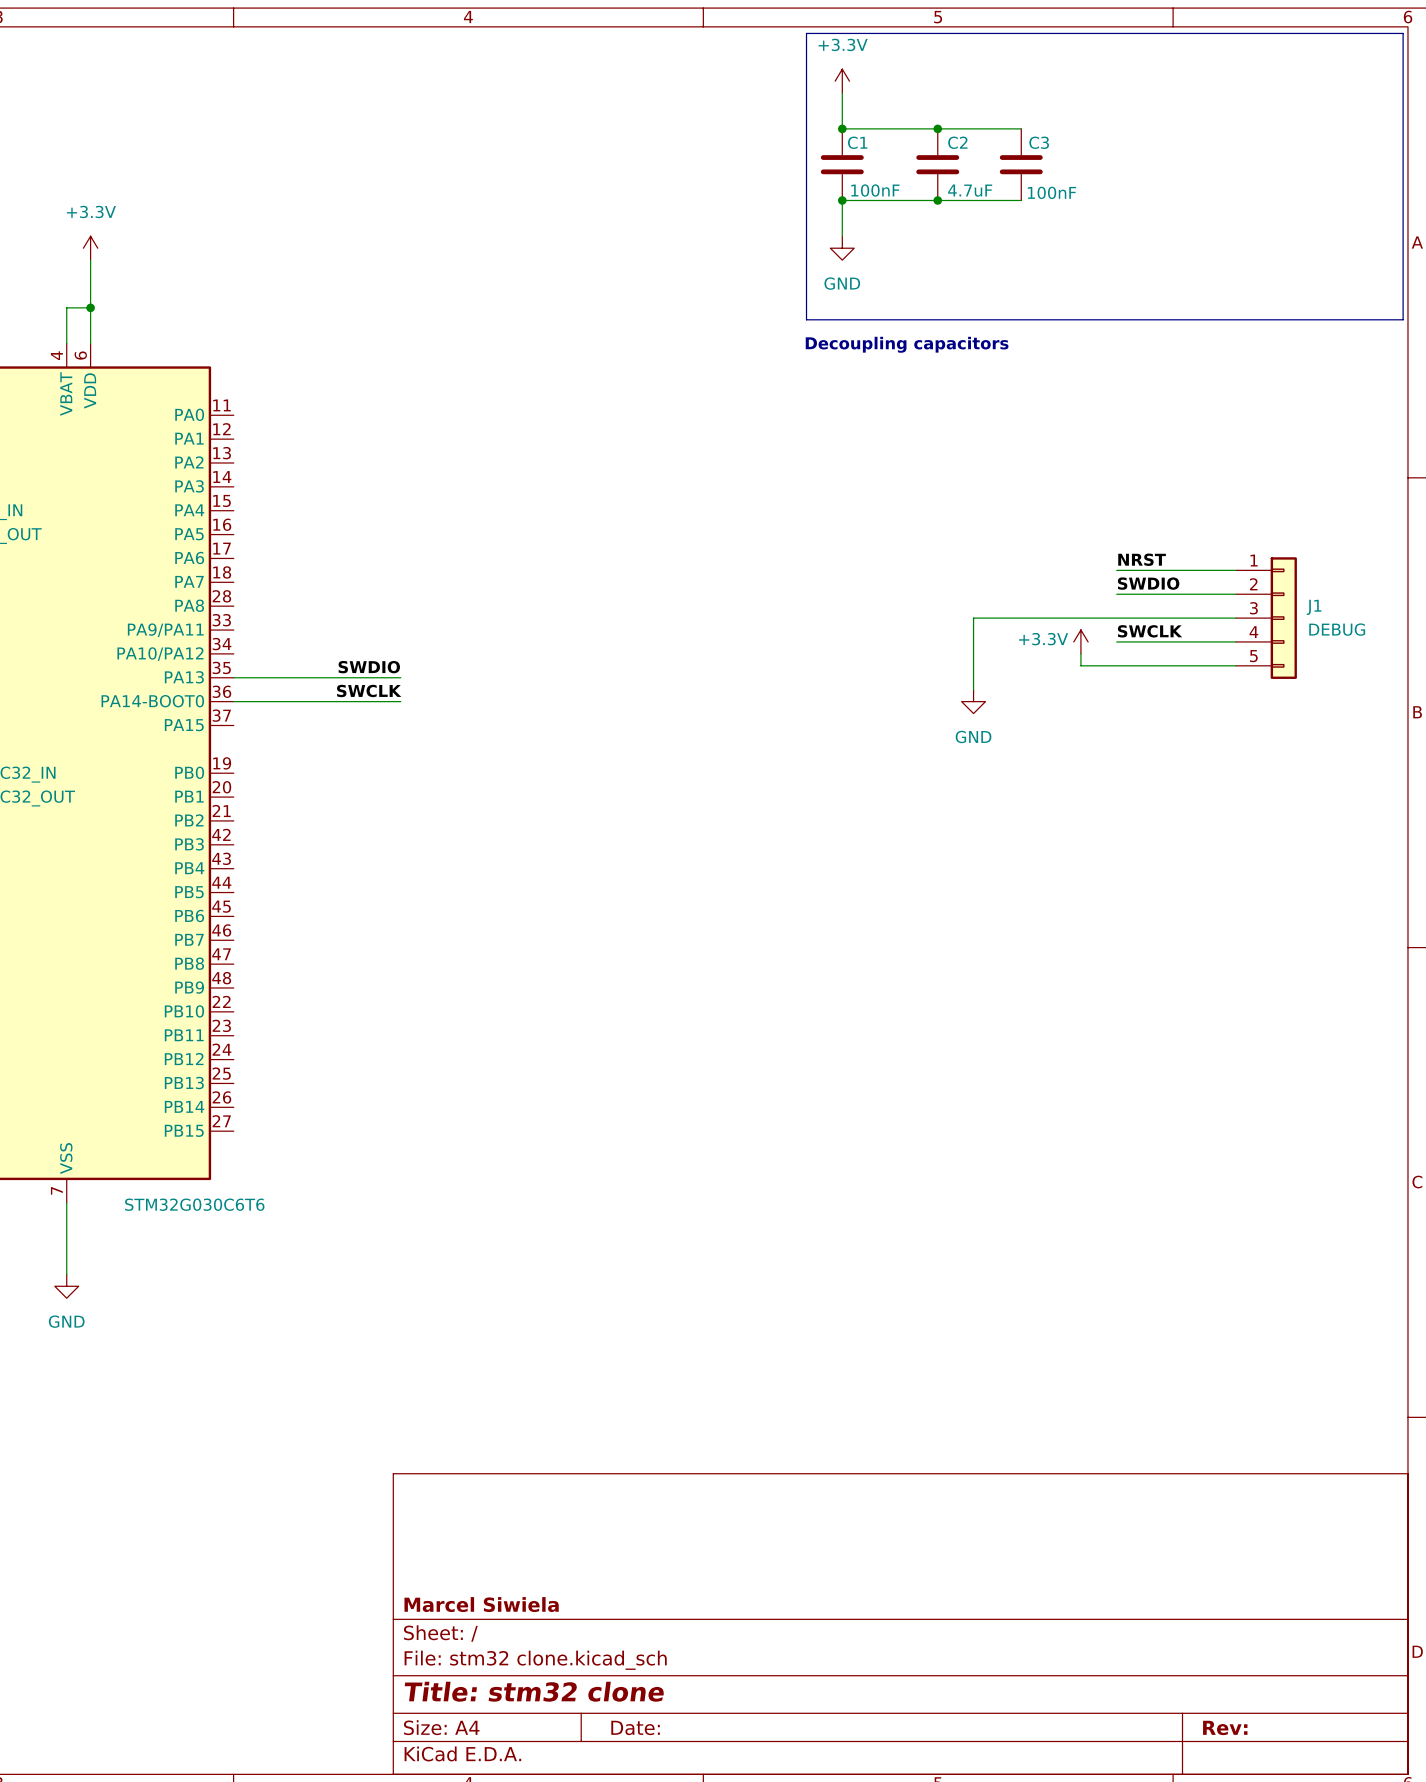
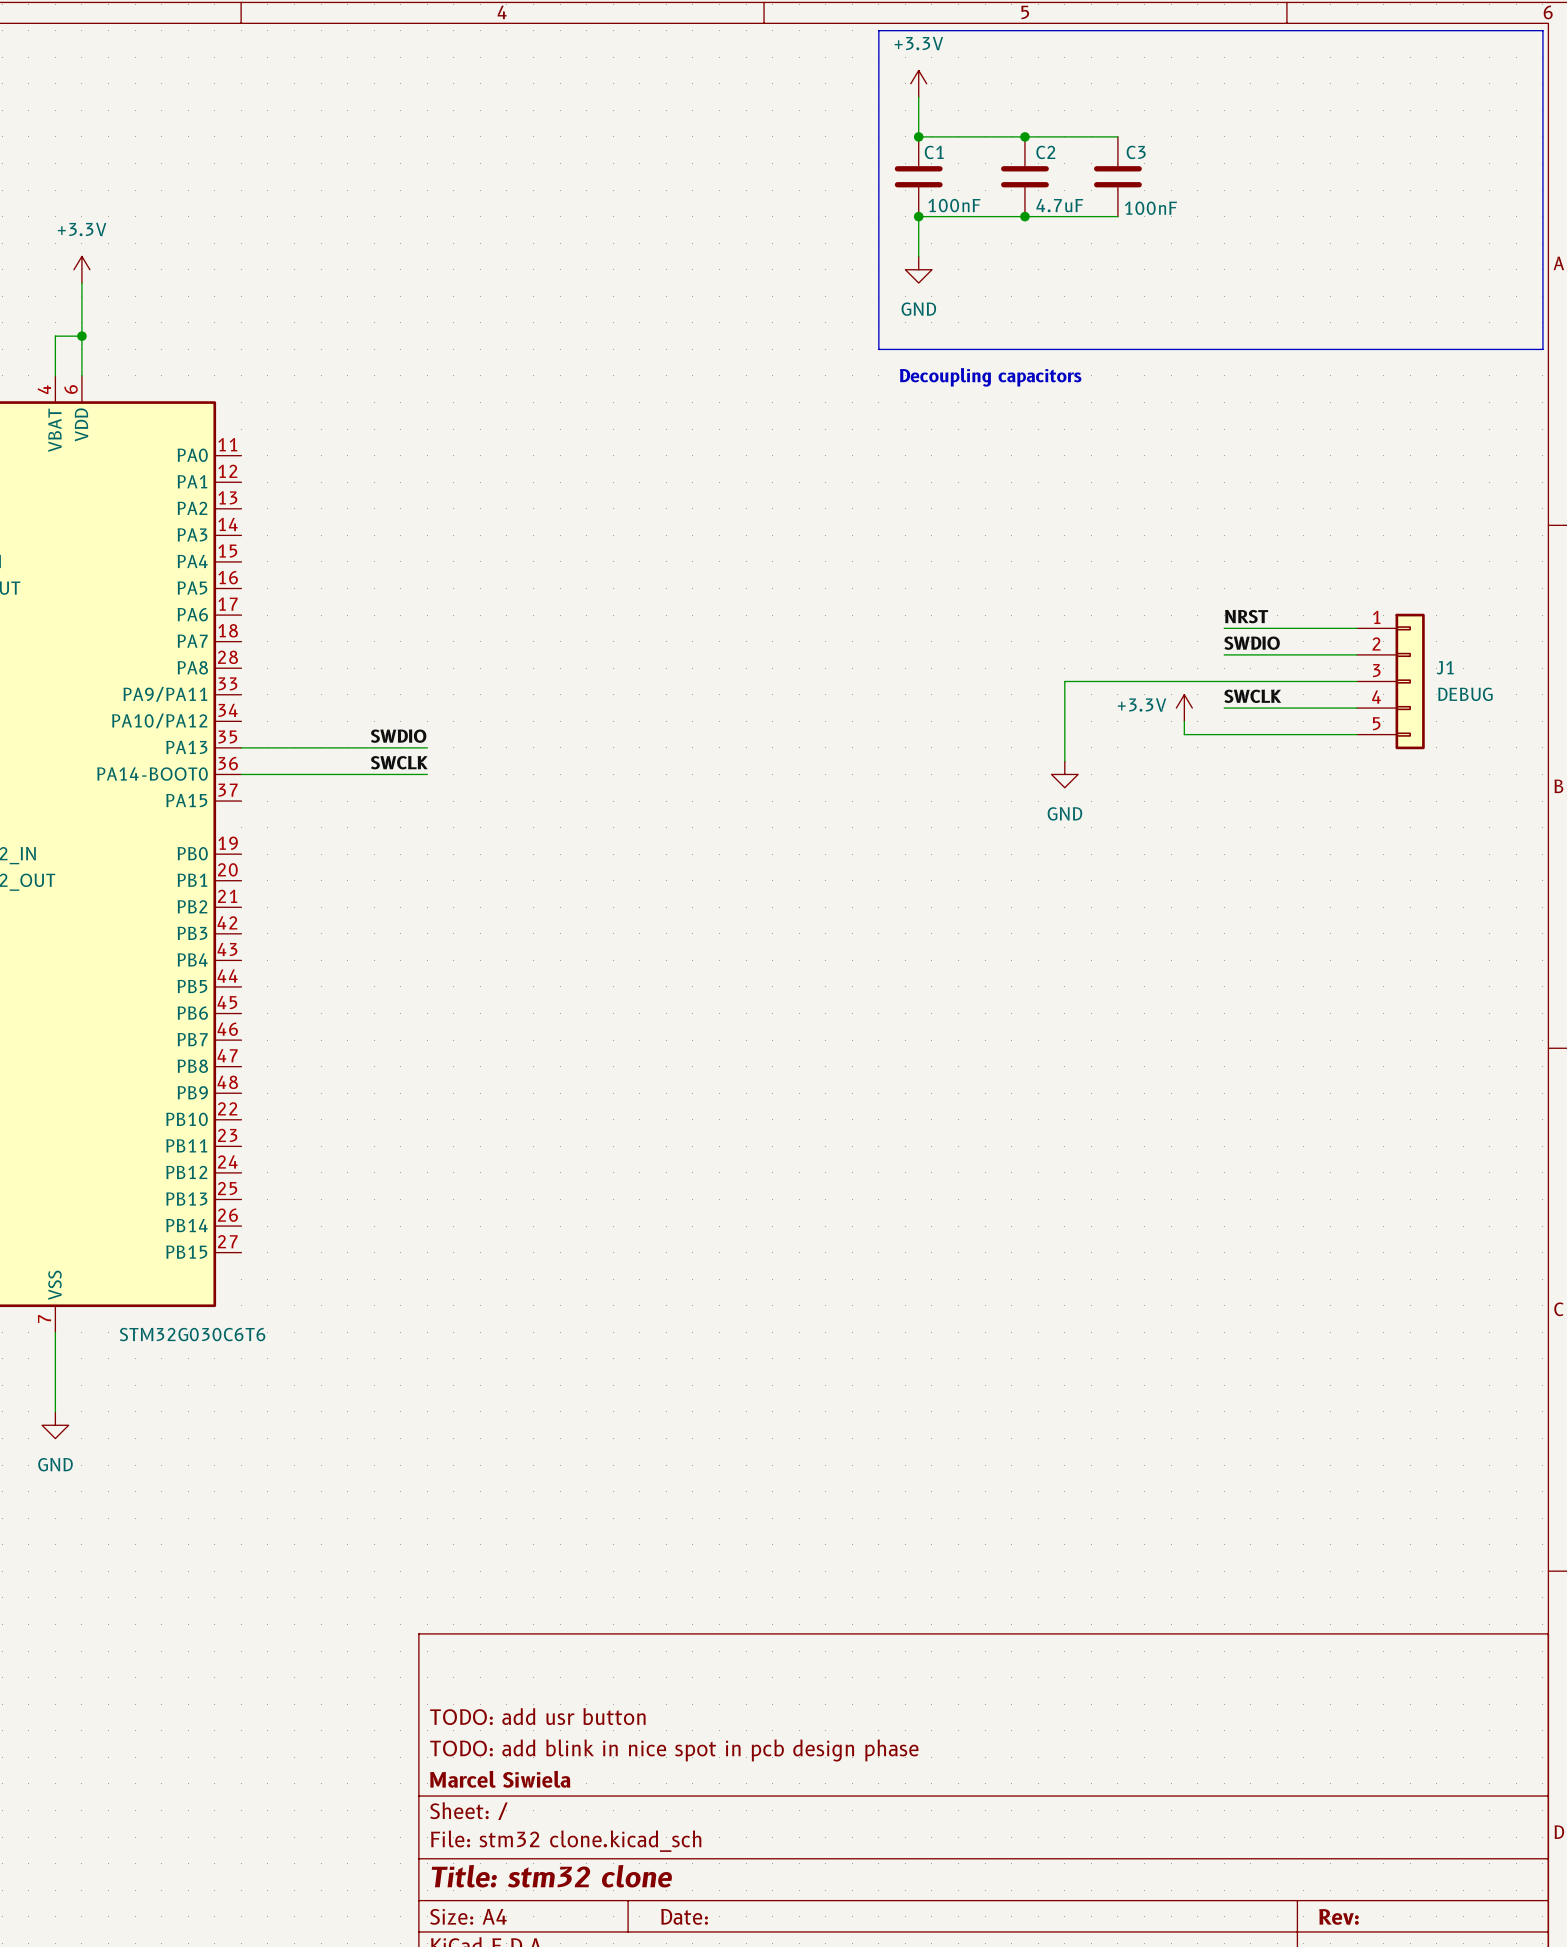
title block: none -> TODO: add usr button (537, 1716)
title block: none -> TODO: add blink in nice spot in pcb design phase (674, 1750)

